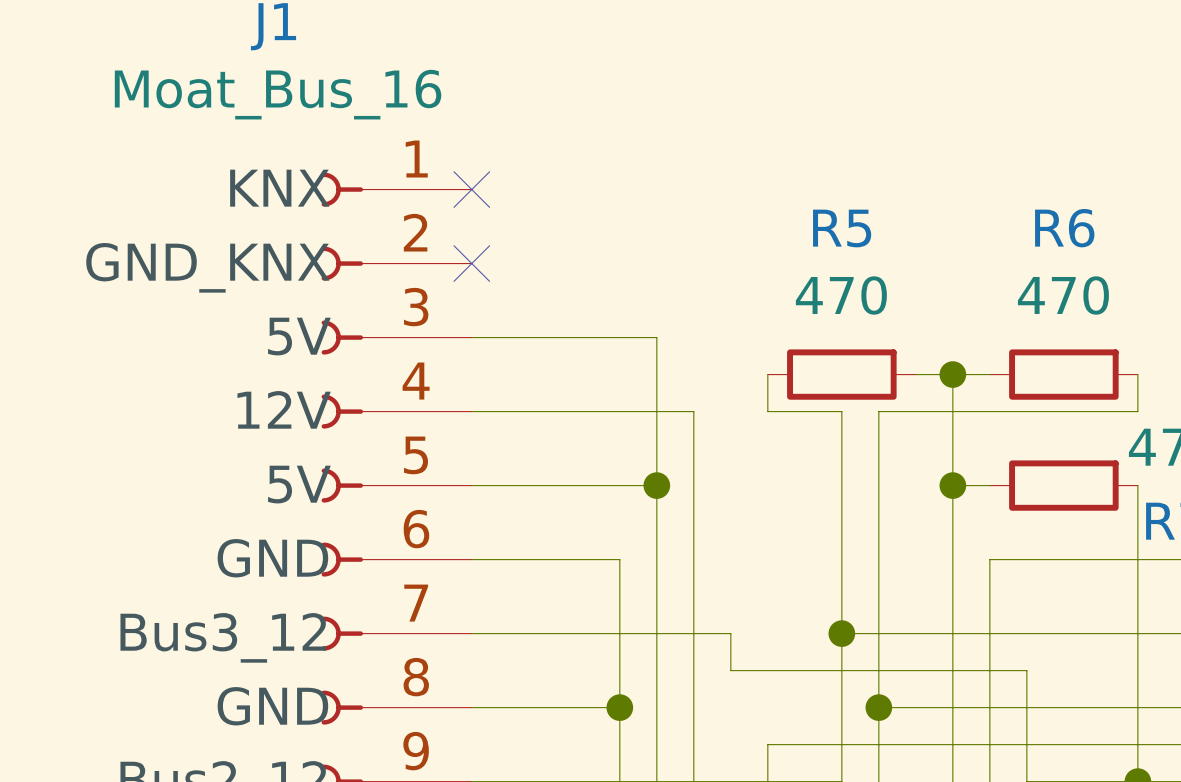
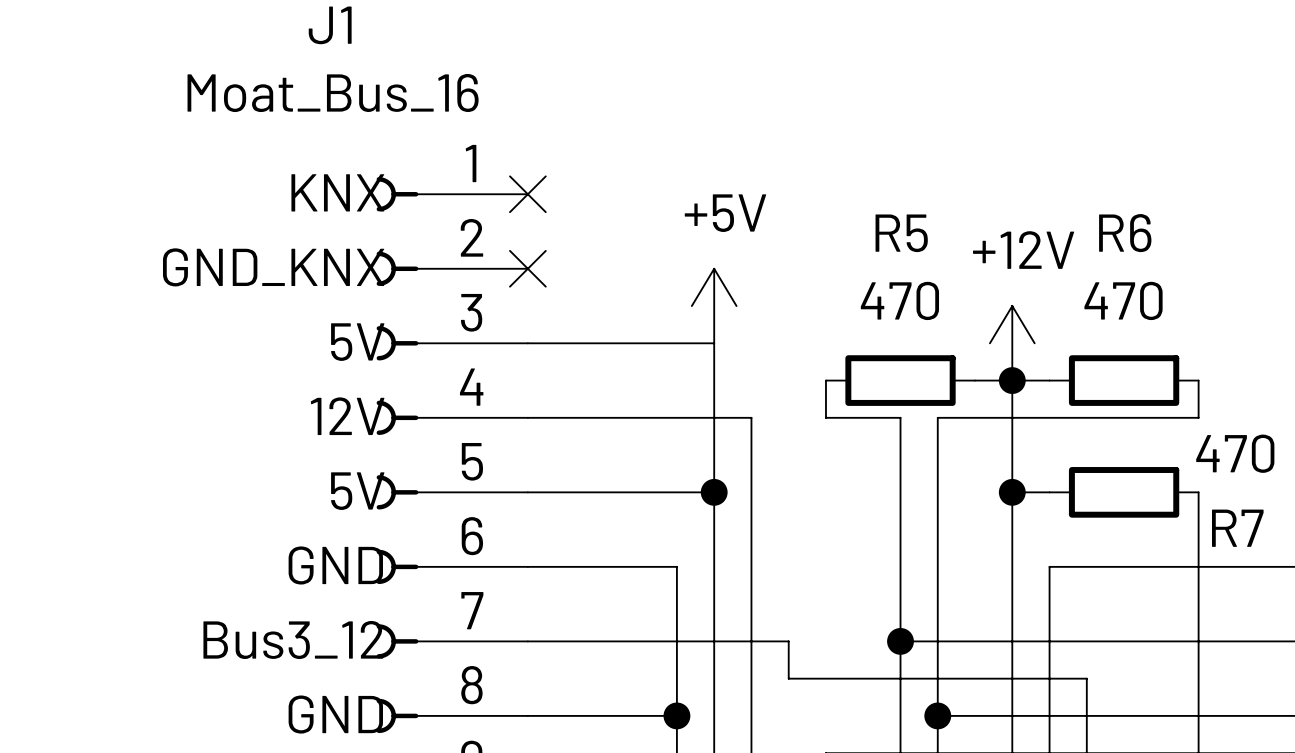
power symbol: none -> +5V (714, 306)
power symbol: none -> +12V (1012, 343)

